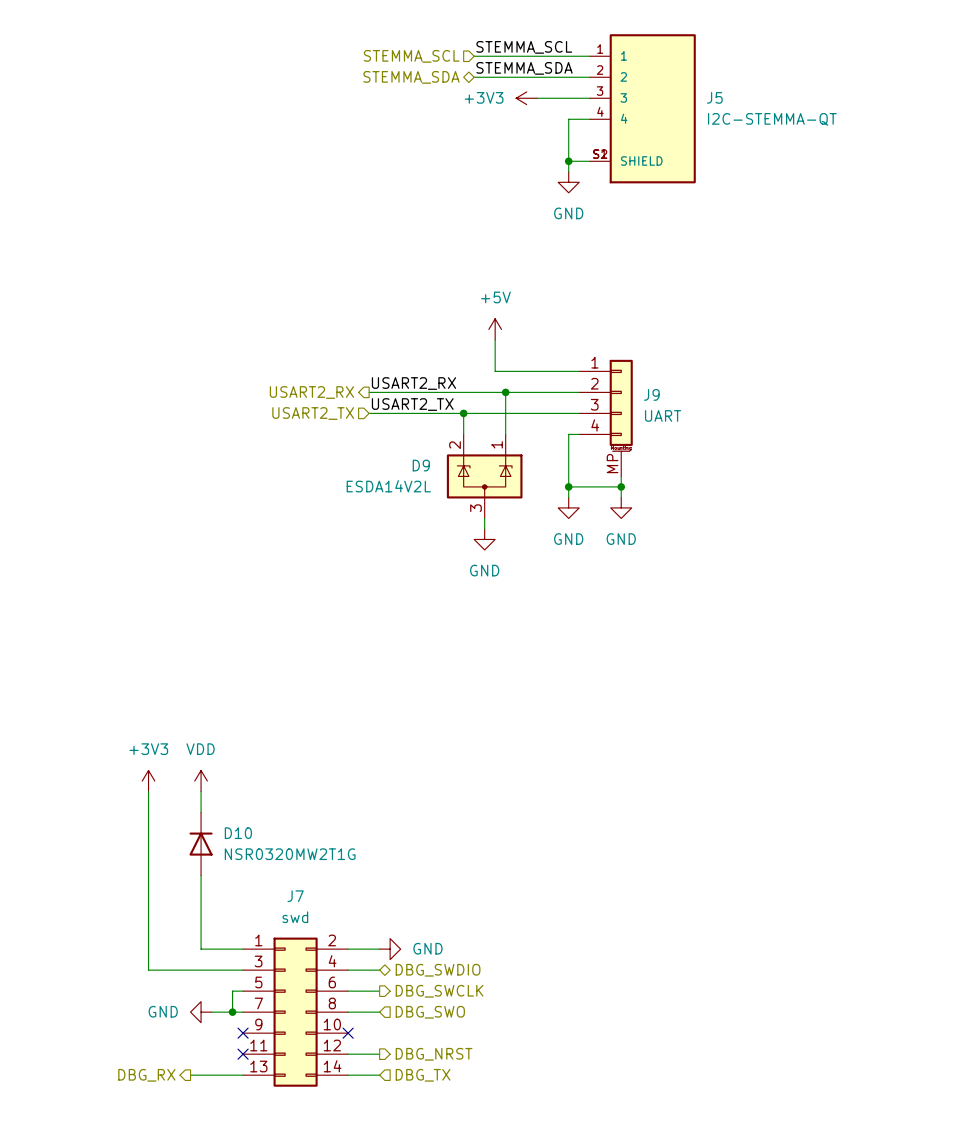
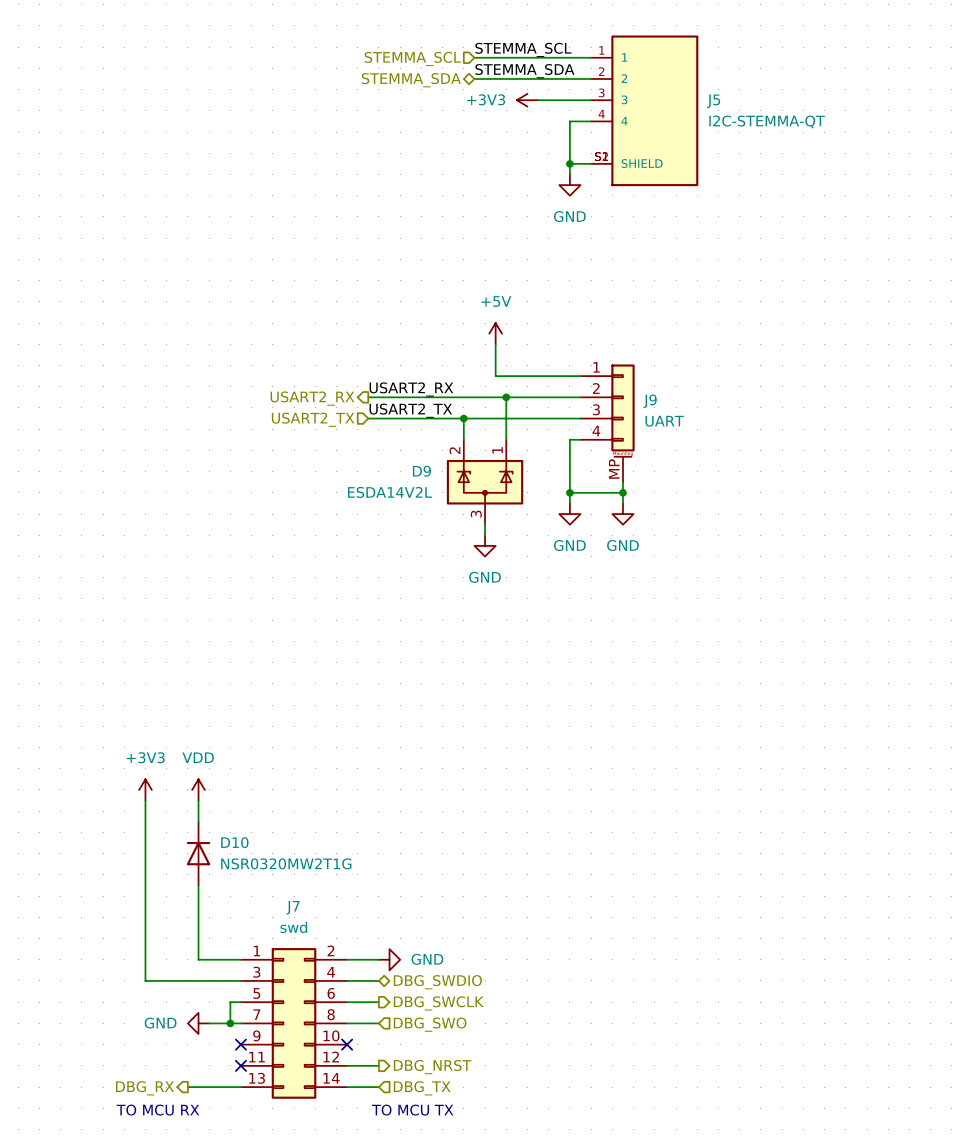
text: none -> TO MCU RX (157, 1110)
text: none -> TO MCU TX (412, 1110)

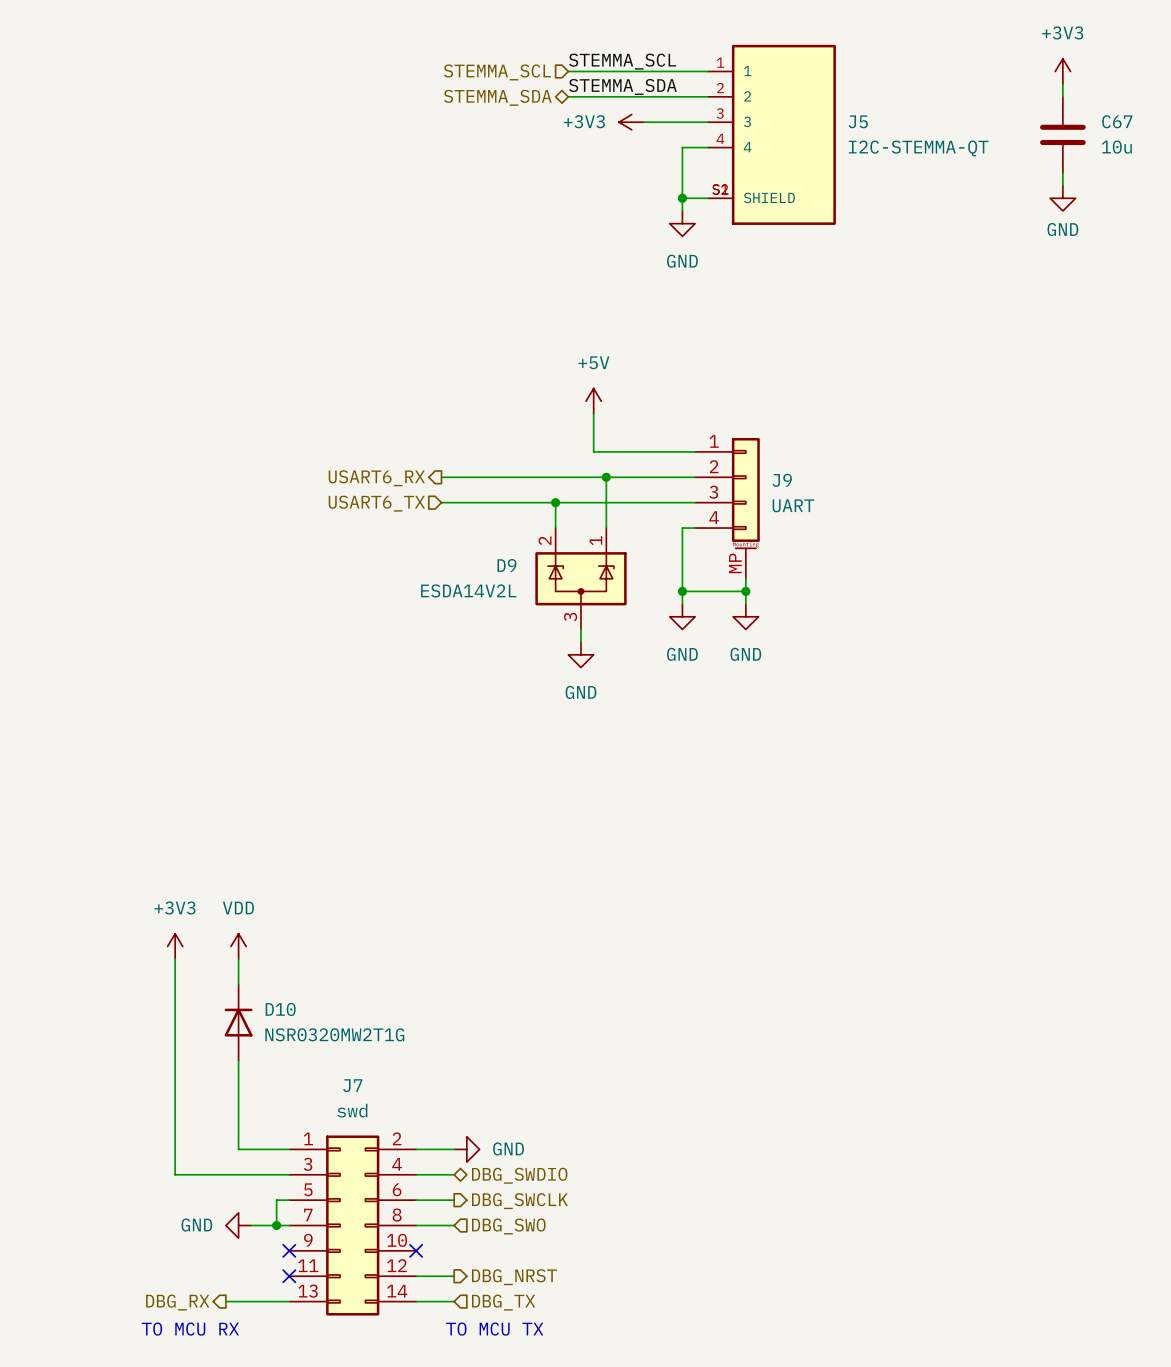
power symbol: none -> +3V3 (1062, 71)
wire: none -> (1062, 84) (1062, 96)
C67: none -> 10u (1062, 134)
wire: none -> (1062, 172) (1062, 185)
power symbol: none -> GND (1062, 198)
label: USART2_RX (411, 389) -> none
hierarchical label: USART2_RX (312, 398) -> USART6_RX (376, 478)
label: USART2_TX (410, 410) -> none
hierarchical label: USART2_TX (313, 419) -> USART6_TX (376, 503)

